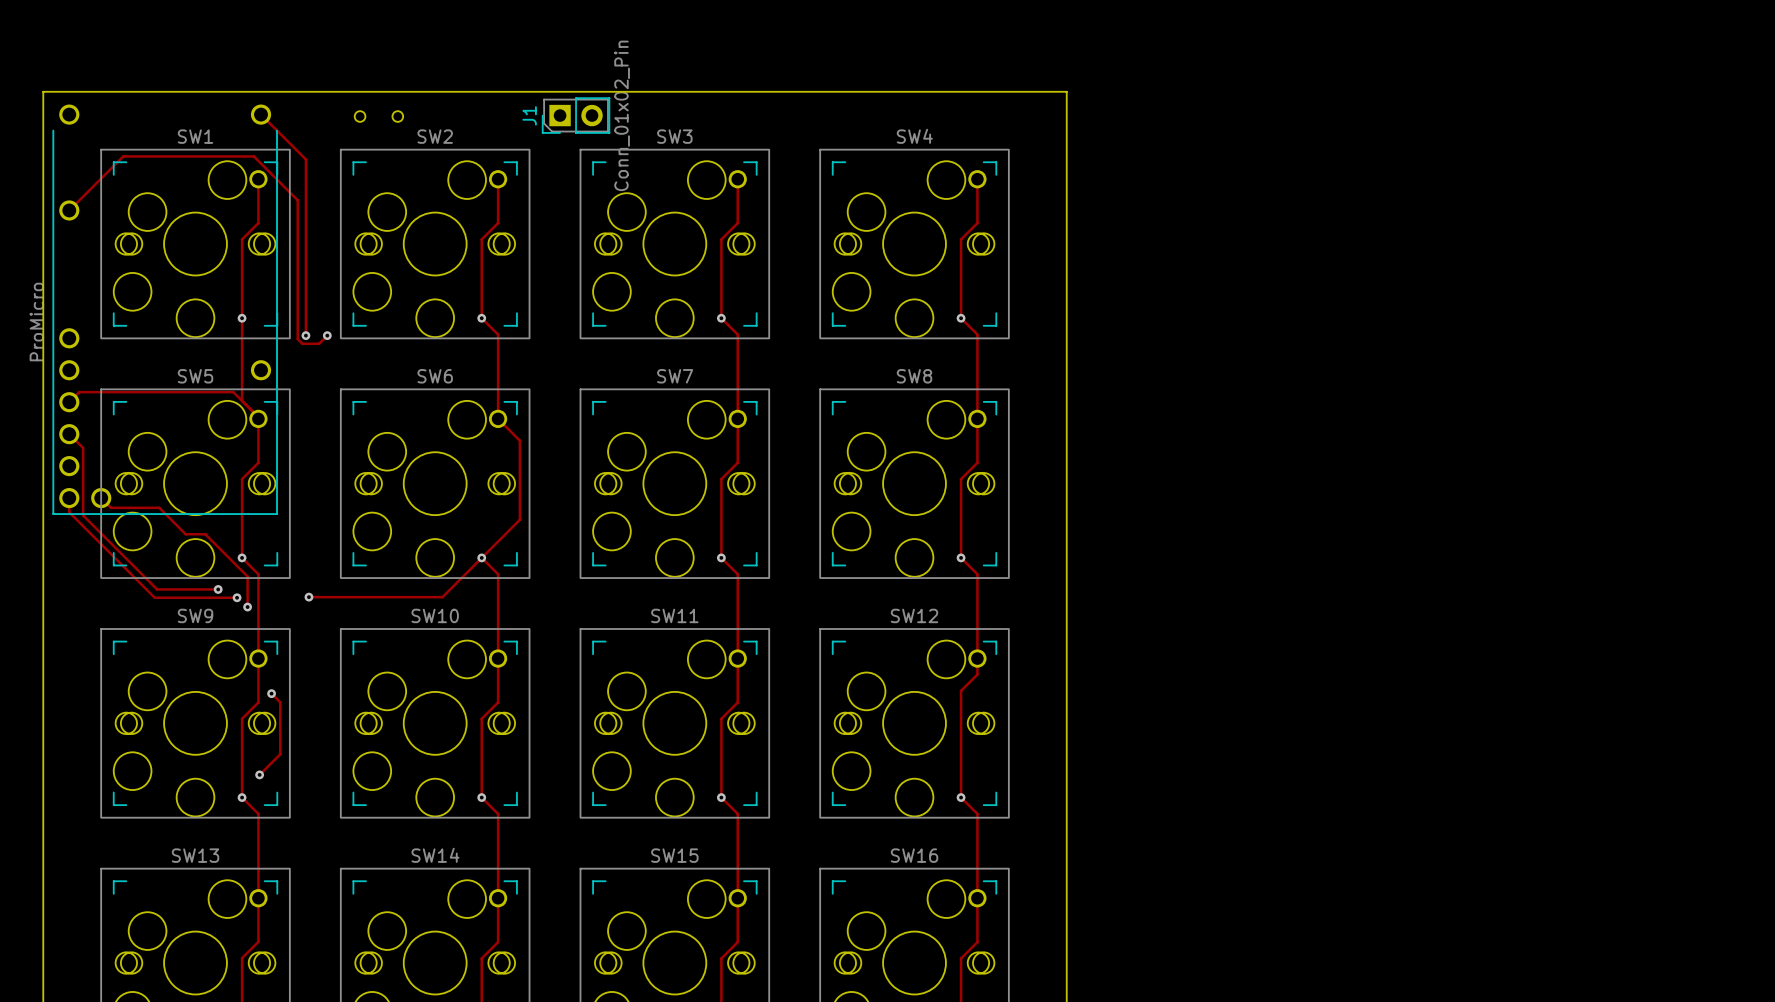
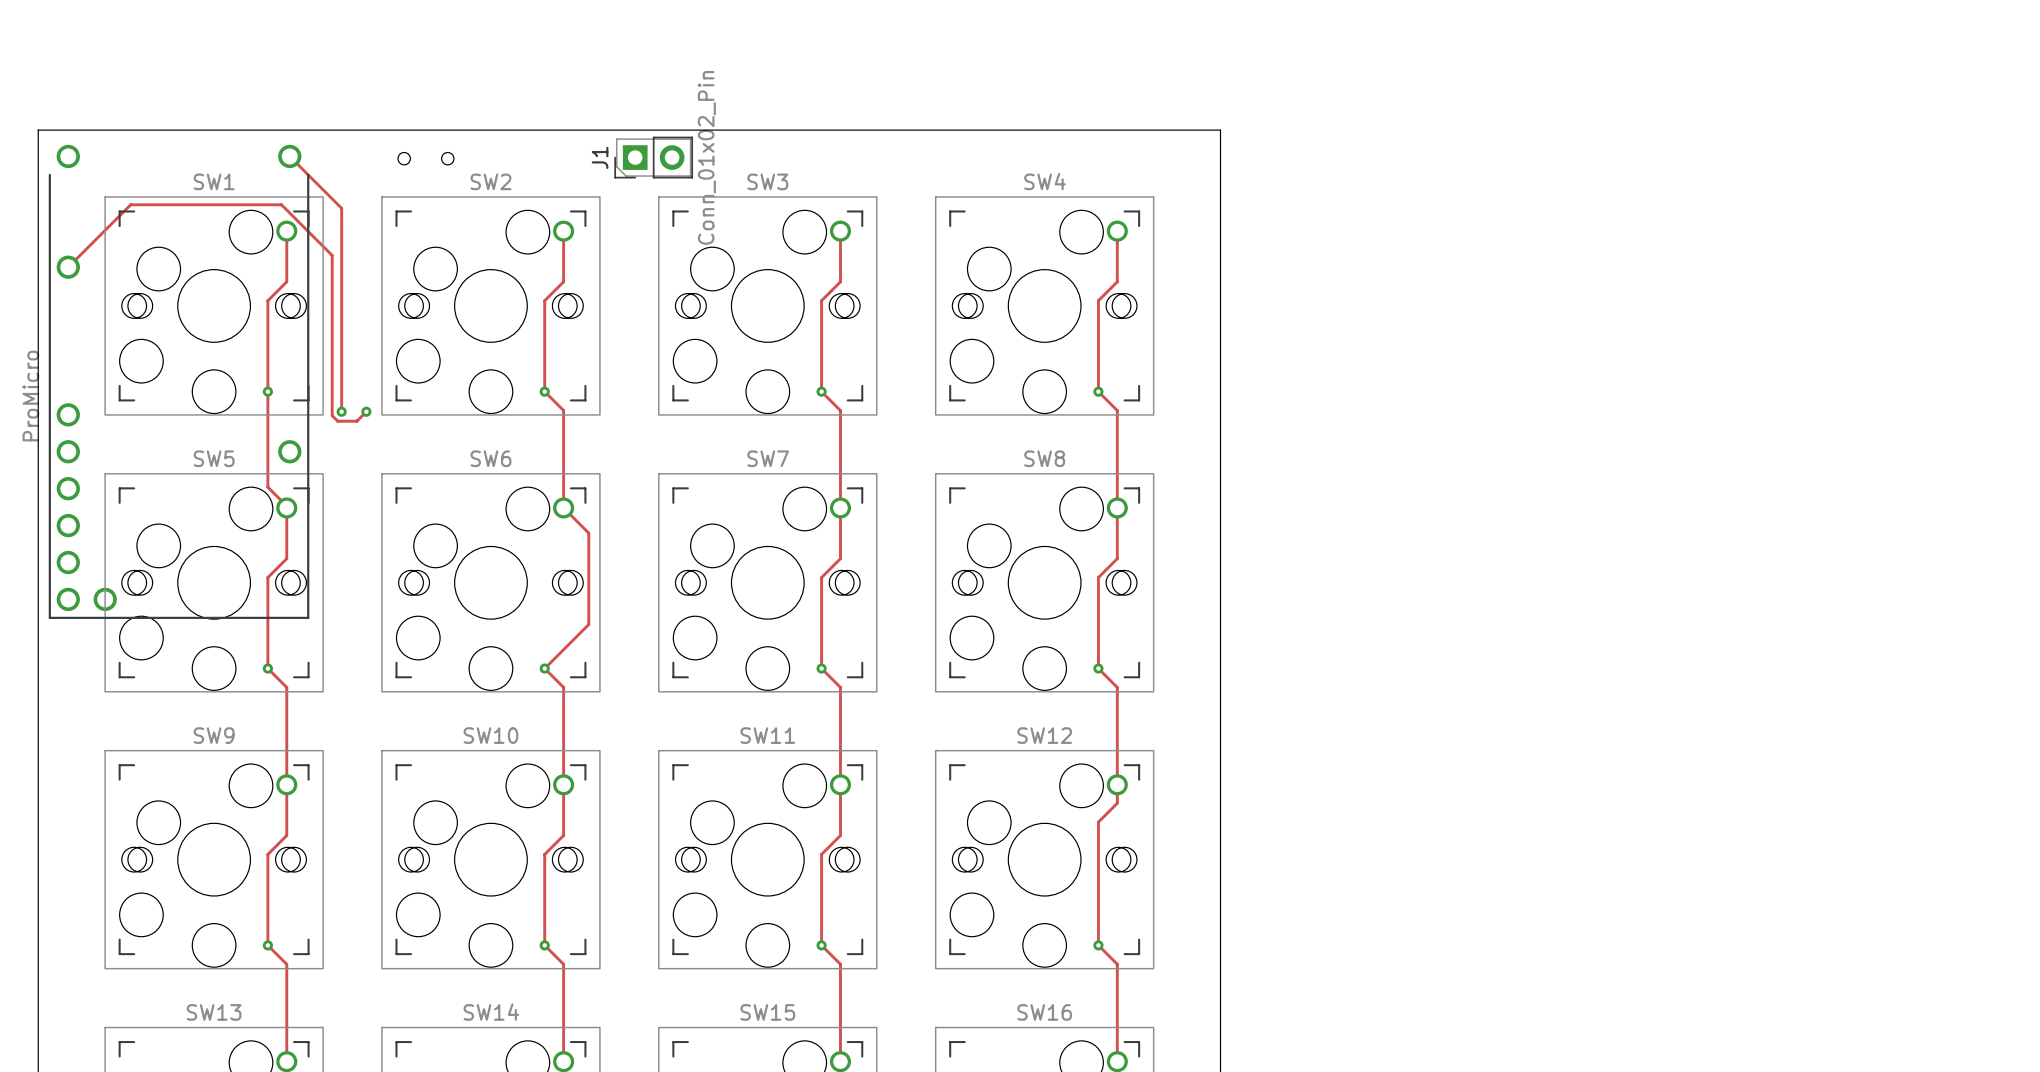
track: (242, 400) (233, 392) (79, 392) (69, 402) -> none
track: (69, 434) (83, 448) (83, 515) (157, 589) (218, 589) -> none
track: (69, 498) (69, 512) (154, 597) (237, 597) -> none
track: (101, 498) (111, 507) (159, 507) (185, 534) (205, 534) (247, 576) (247, 607) -> none
track: (481, 557) (442, 597) (308, 597) -> none
via: (218, 589) -> none
via: (237, 597) -> none
via: (308, 597) -> none
via: (247, 607) -> none
track: (271, 693) (280, 702) (280, 754) (259, 774) -> none
via: (271, 693) -> none
via: (259, 774) -> none

